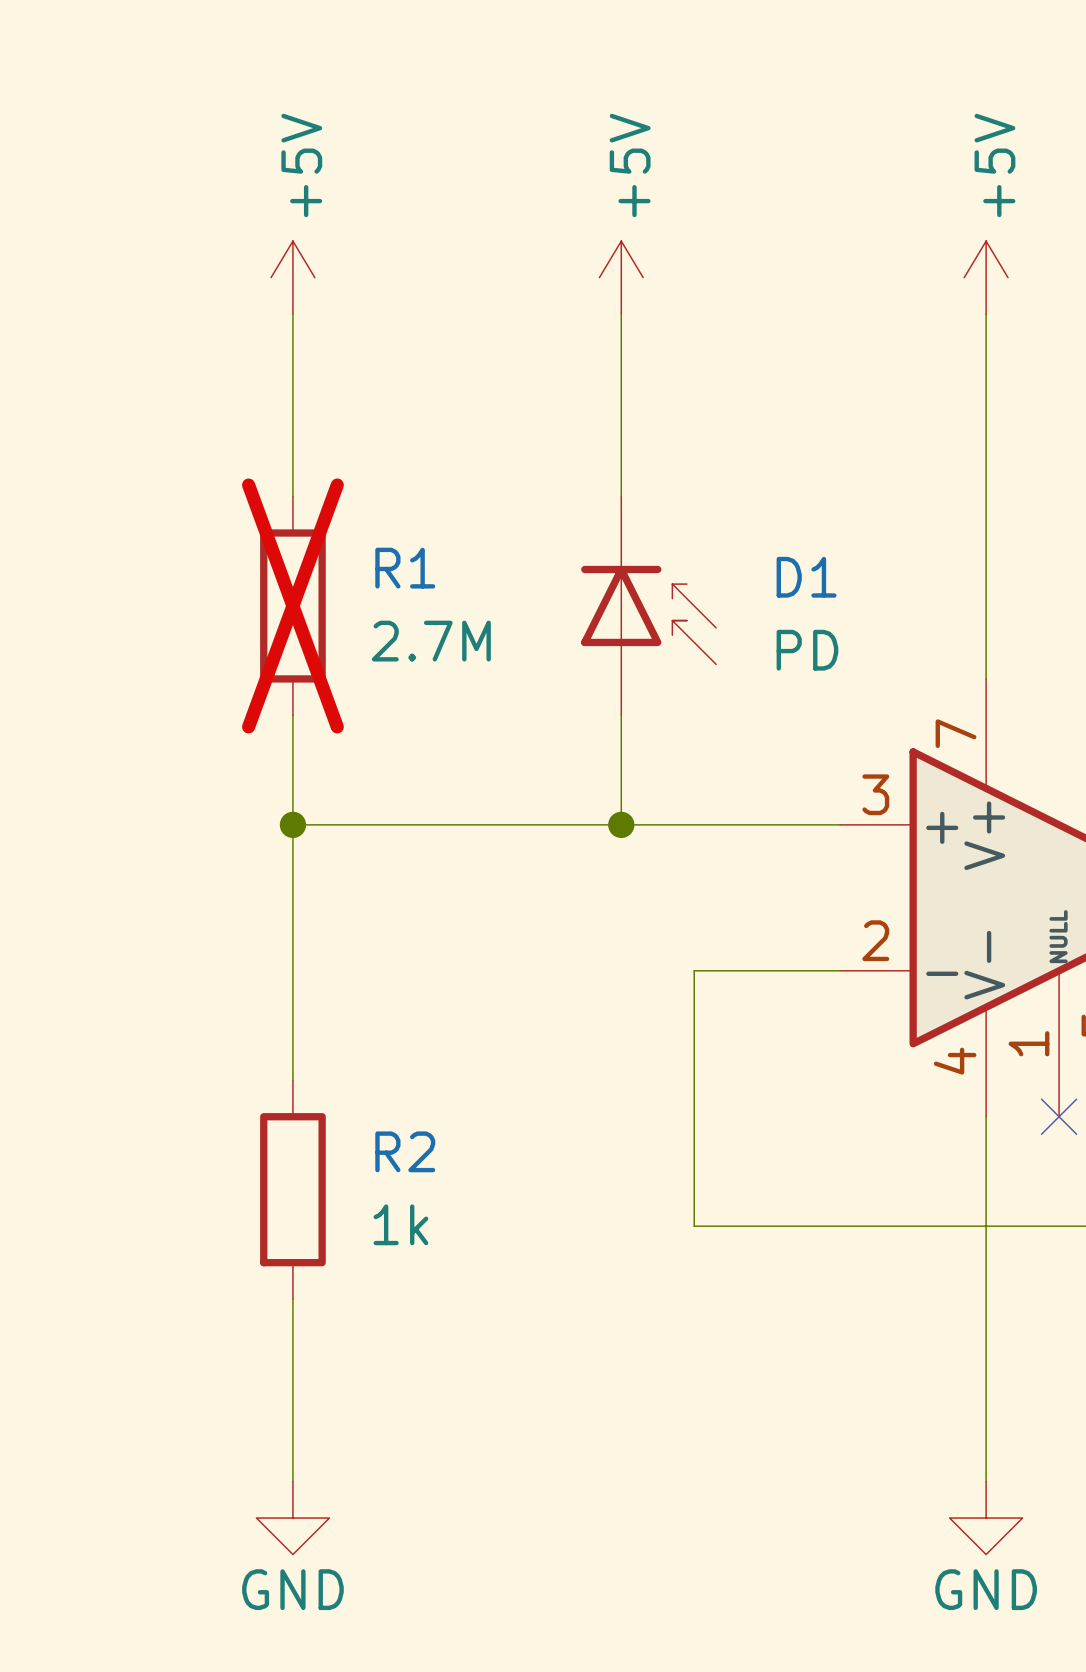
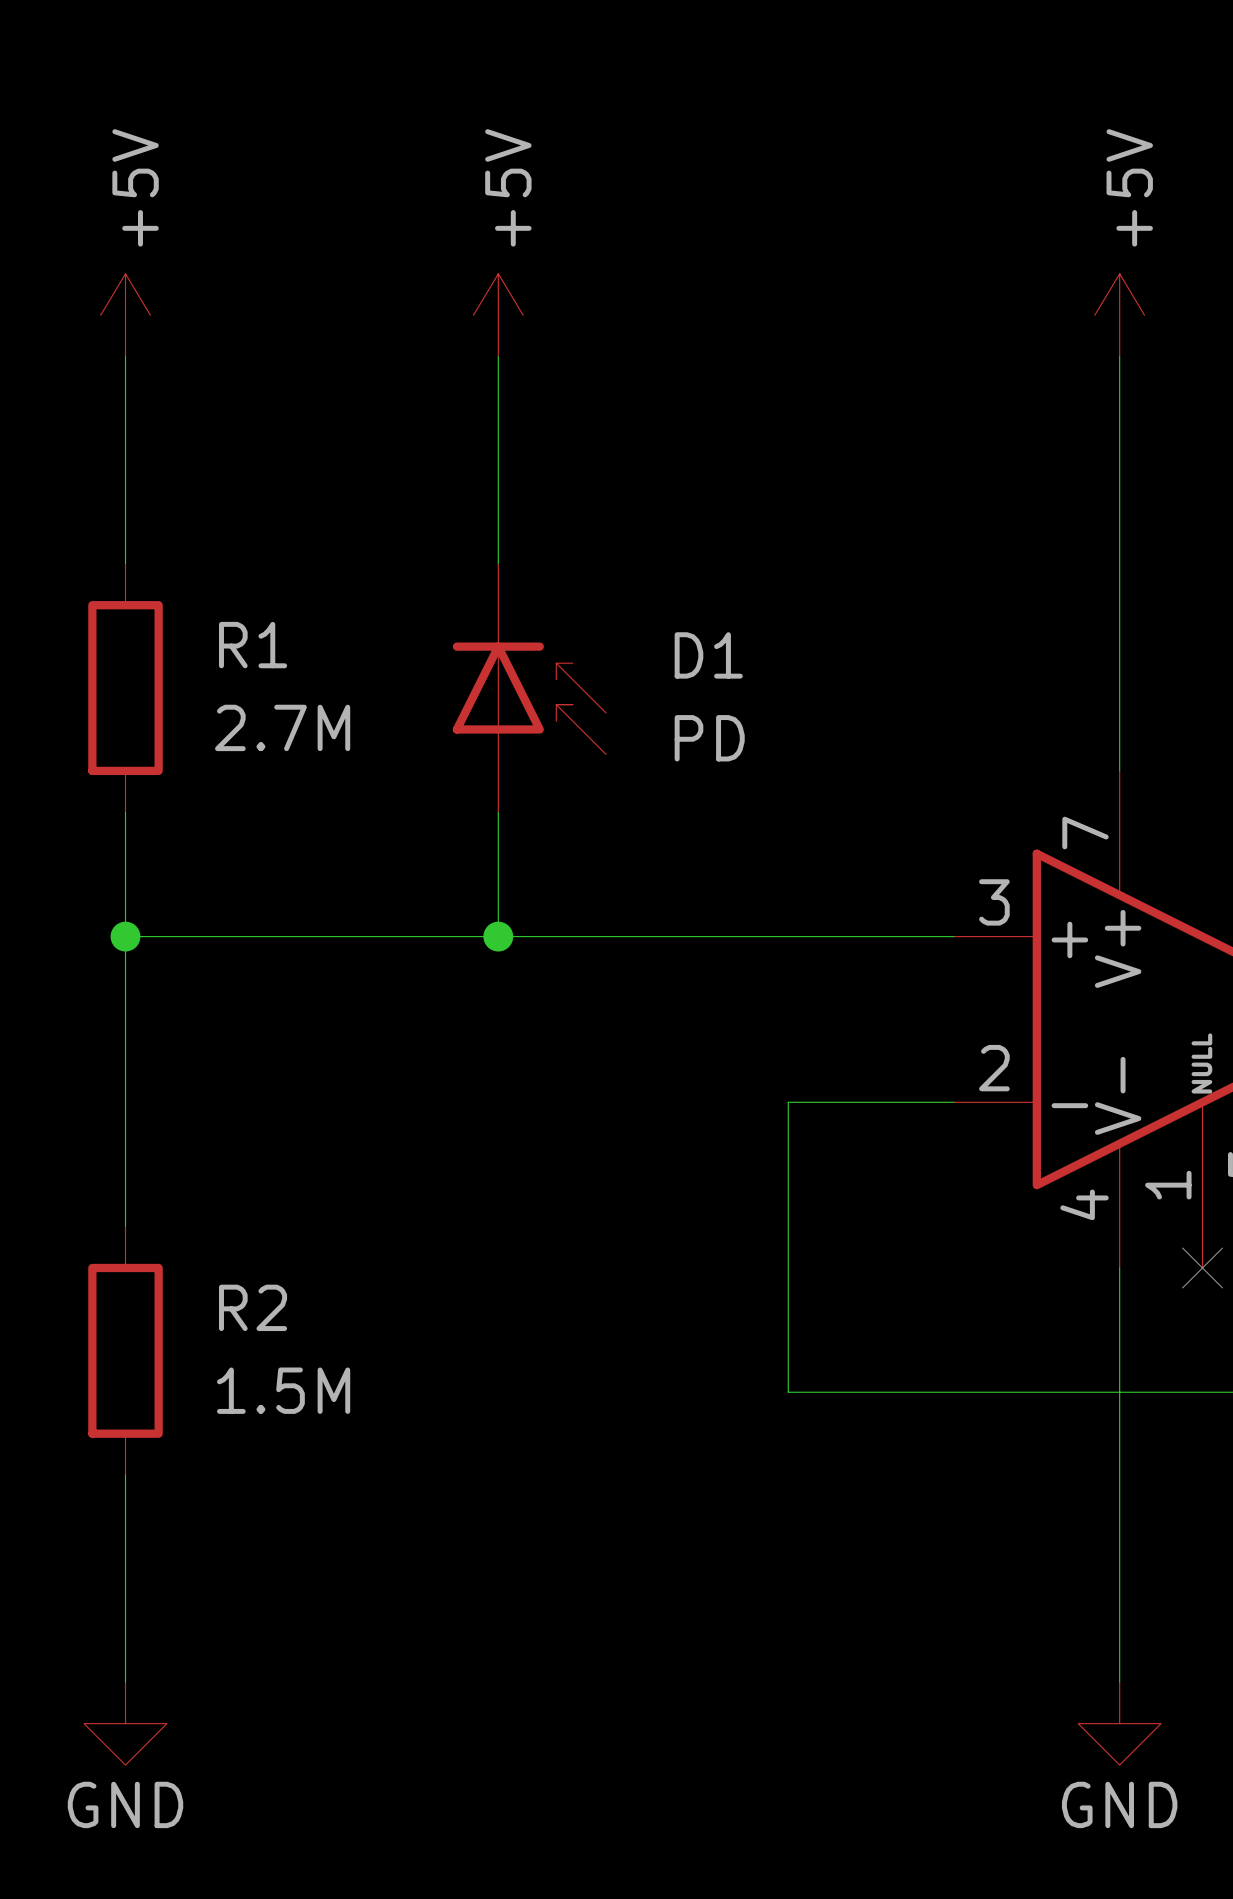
power symbol: none -> +5V (125, 315)
power symbol: +5V (292, 277) -> none
power symbol: none -> +5V (498, 315)
power symbol: +5V (621, 277) -> none
wire: (292, 314) (292, 496) -> (125, 356) (125, 563)
wire: (621, 314) (621, 496) -> (498, 356) (498, 563)
R1 position: (292, 605) -> (125, 688)
R1 do-not-place cross: (292, 605) -> none
D1 position: (648, 605) -> (529, 688)
wire: (292, 715) (292, 1080) -> (125, 812) (125, 1226)
wire: (621, 715) (621, 824) -> (498, 812) (498, 936)
wire: none -> (125, 936) (332, 936)
junction: none -> (125, 936)
junction: (292, 824) -> none
junction: none -> (498, 936)
junction: (621, 824) -> none
R2 position: (292, 1189) -> (125, 1350)
R2 value: 1k (400, 1224) -> 1.5M (283, 1390)
wire: (292, 1299) (292, 1481) -> (125, 1475) (125, 1682)
power symbol position: GND (292, 1518) -> GND (125, 1723)

